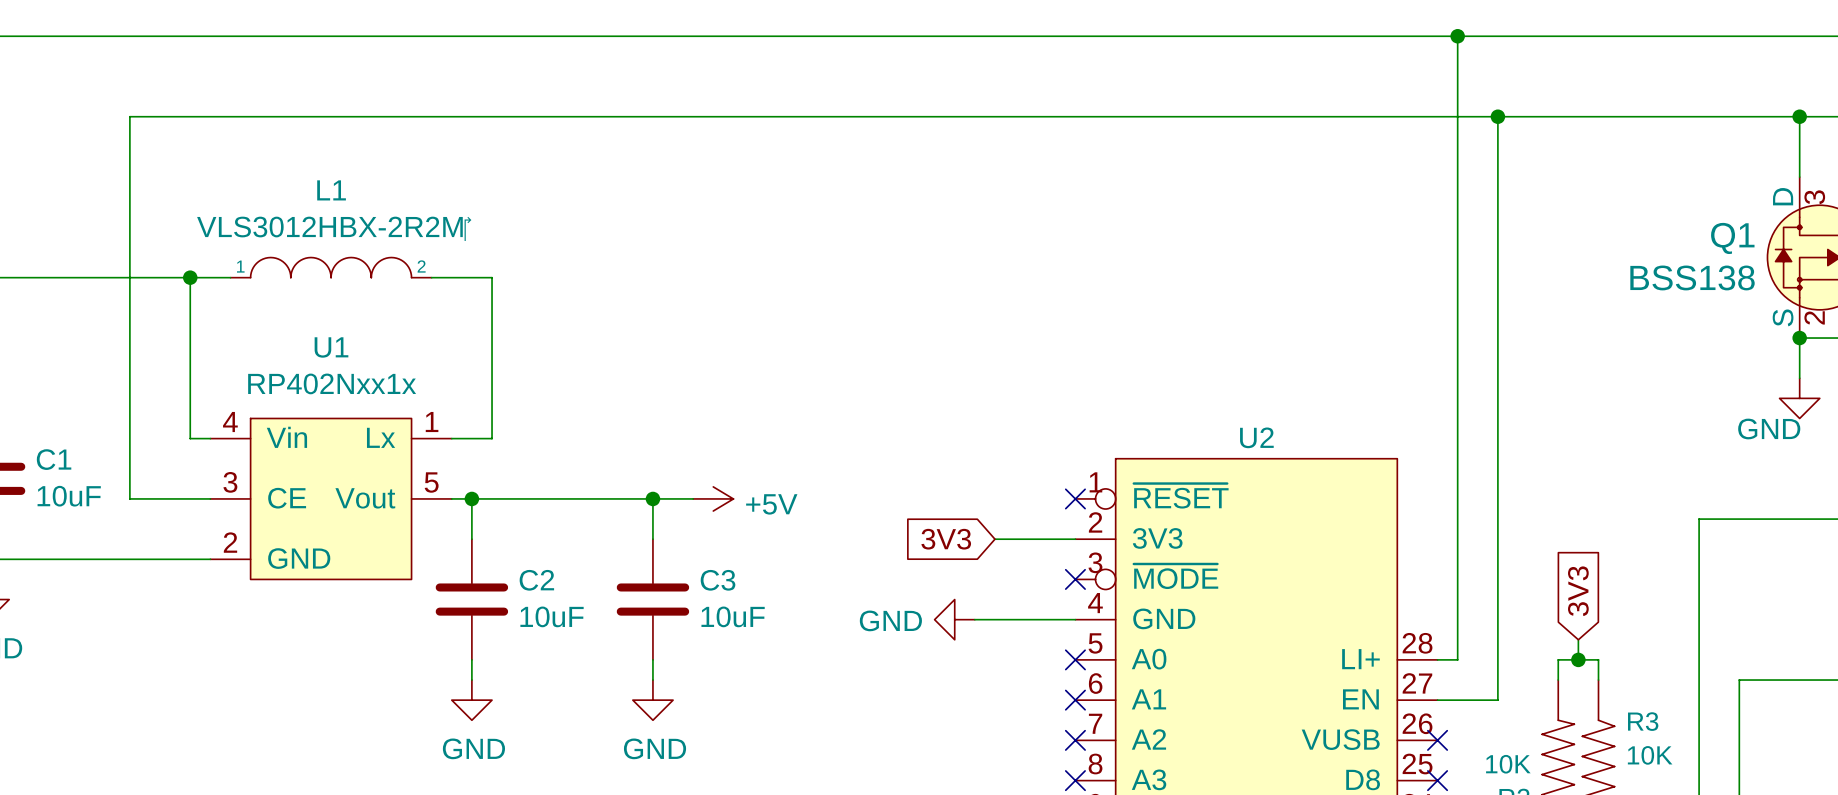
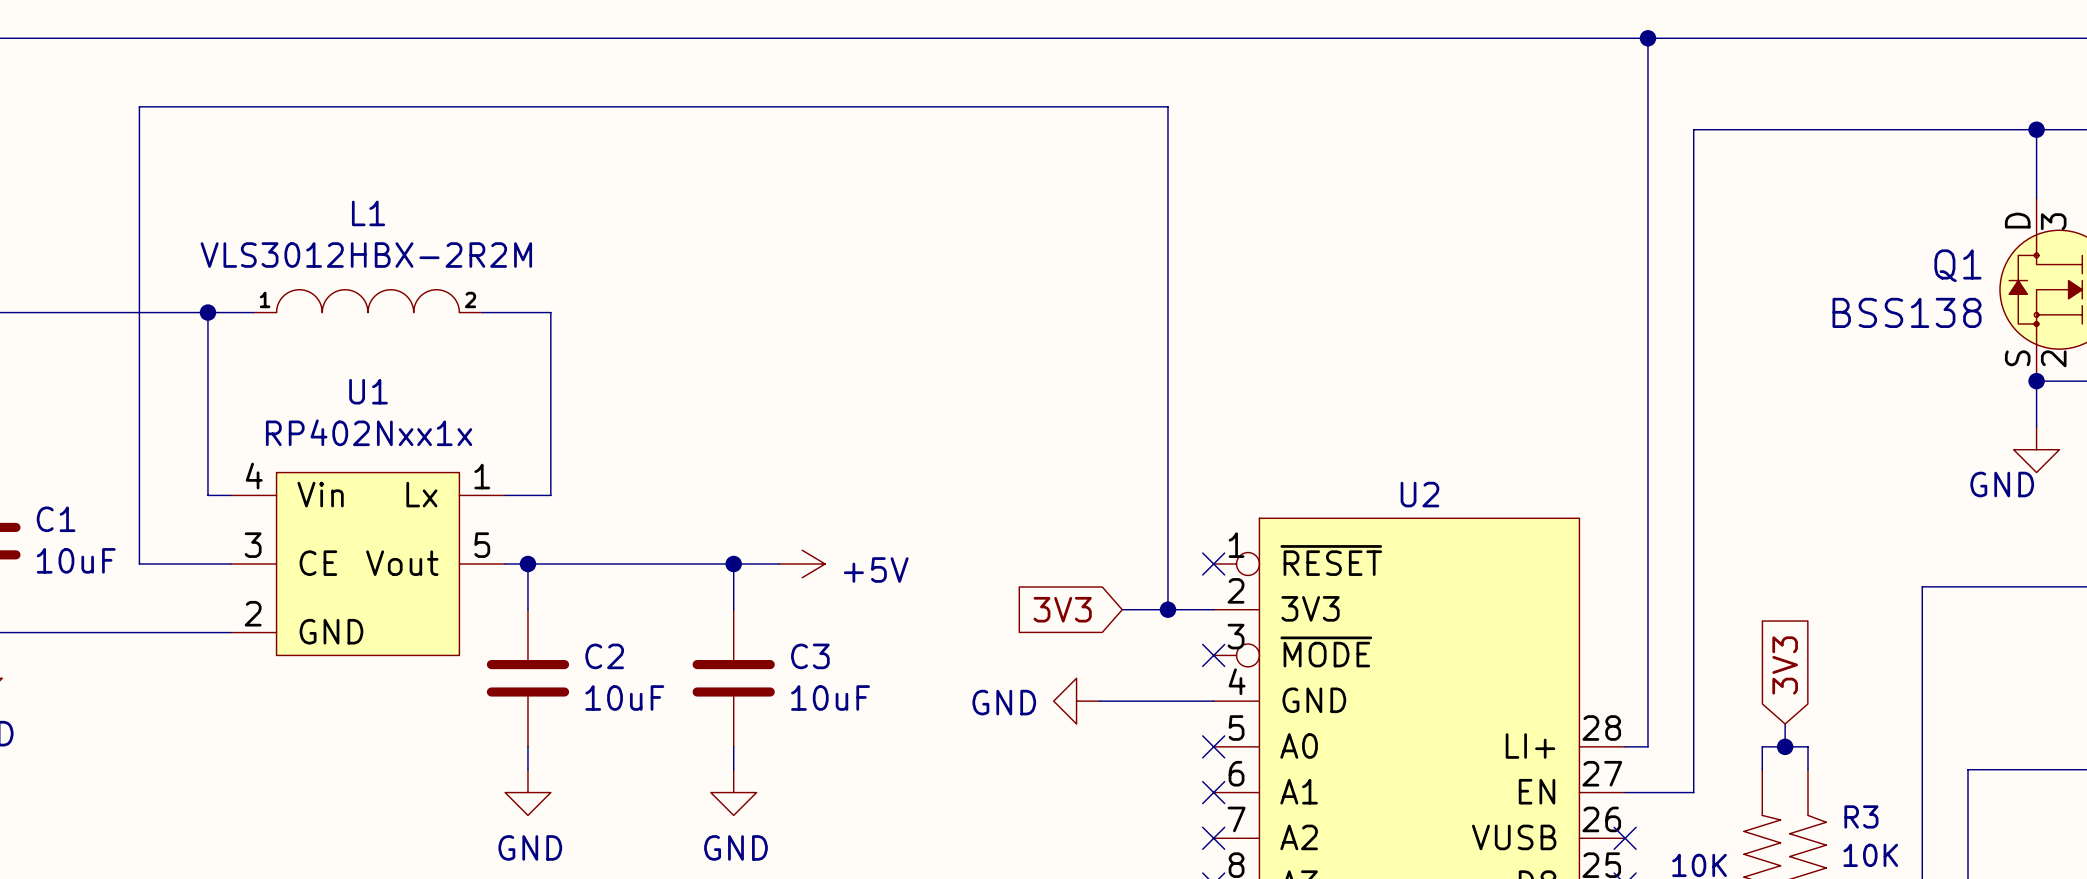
wire: (129, 116) (1497, 116) -> (139, 129) (139, 106) (1167, 106) (1167, 609)
junction: (1497, 116) -> none
junction: none -> (1167, 609)

